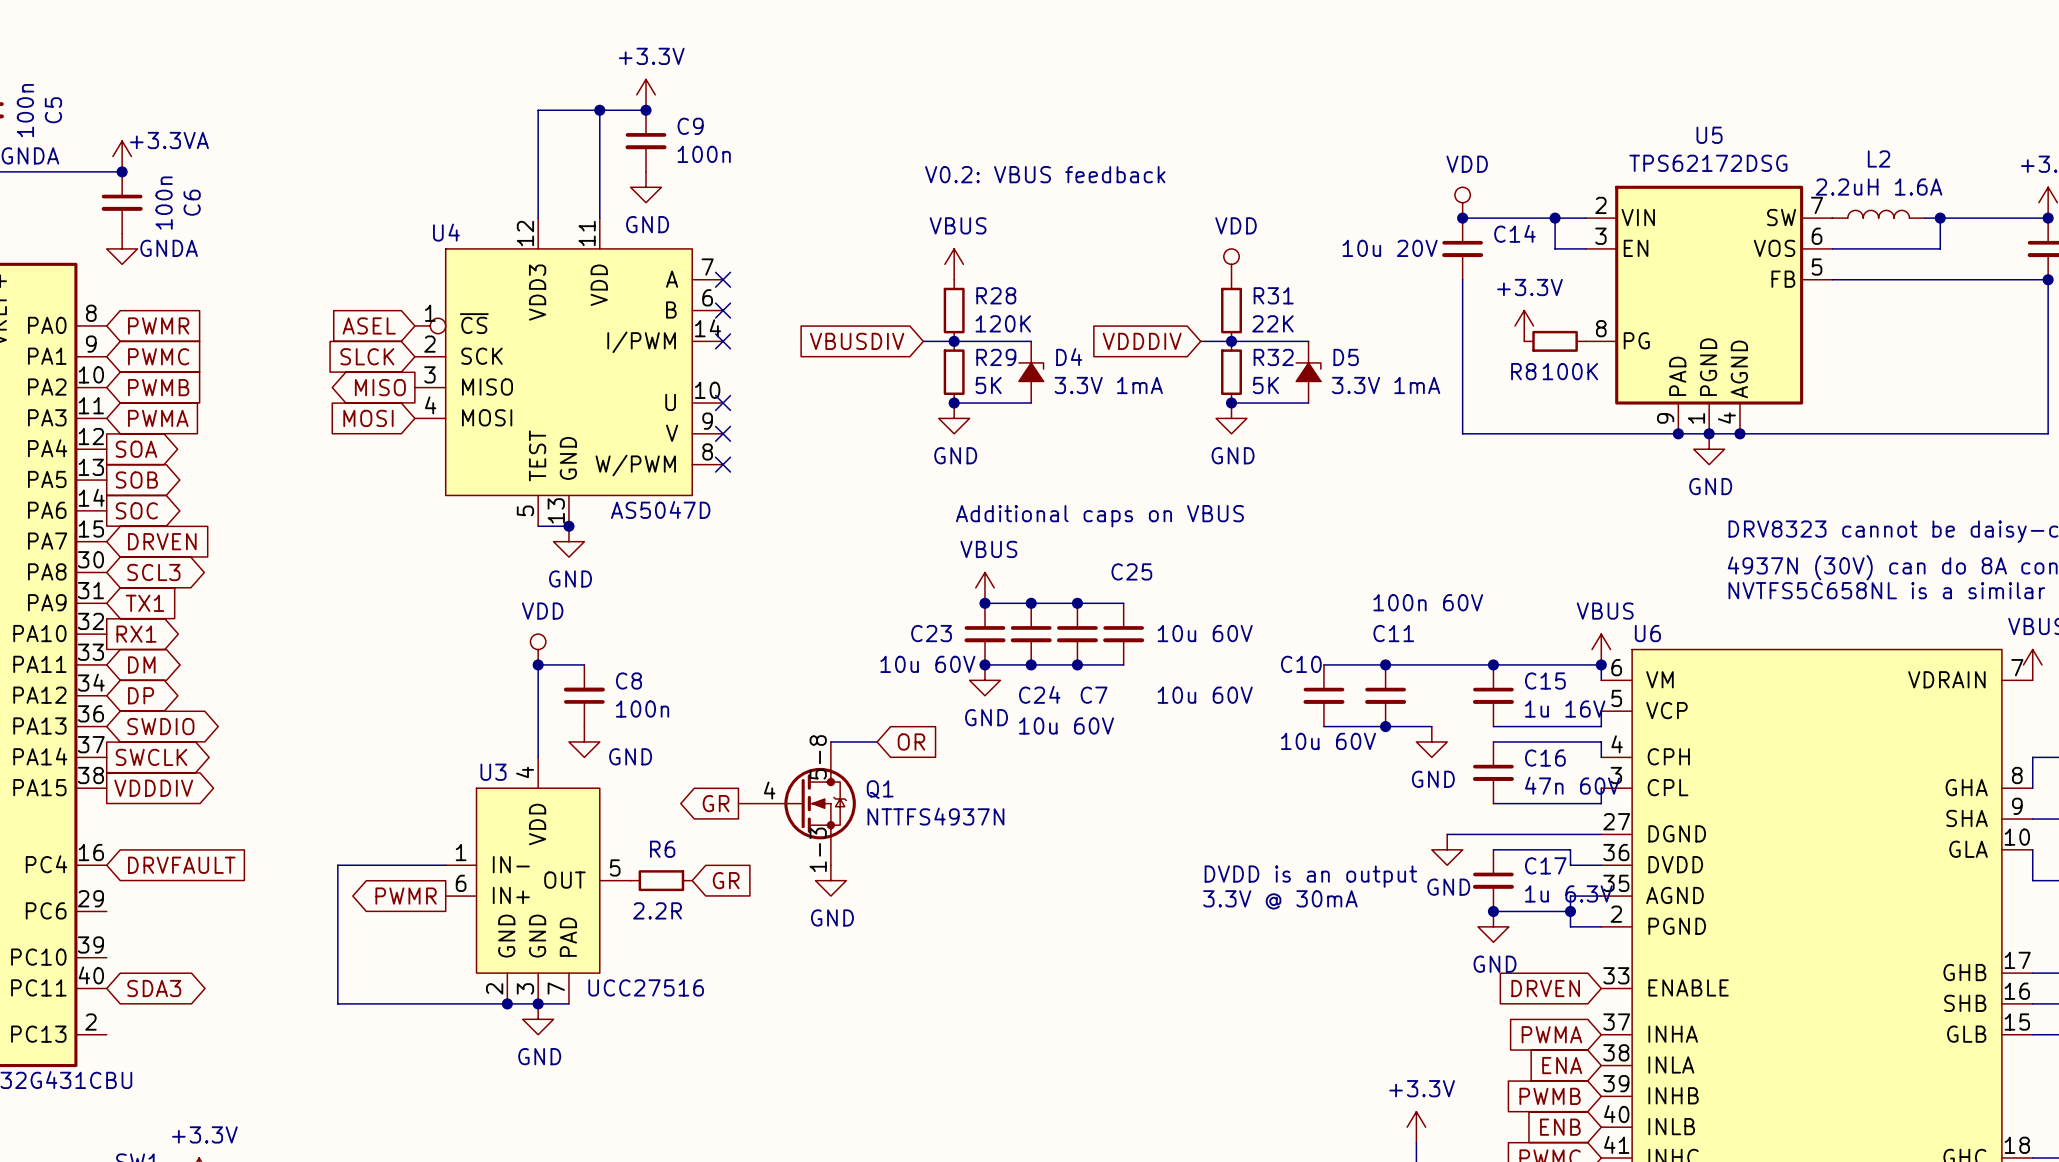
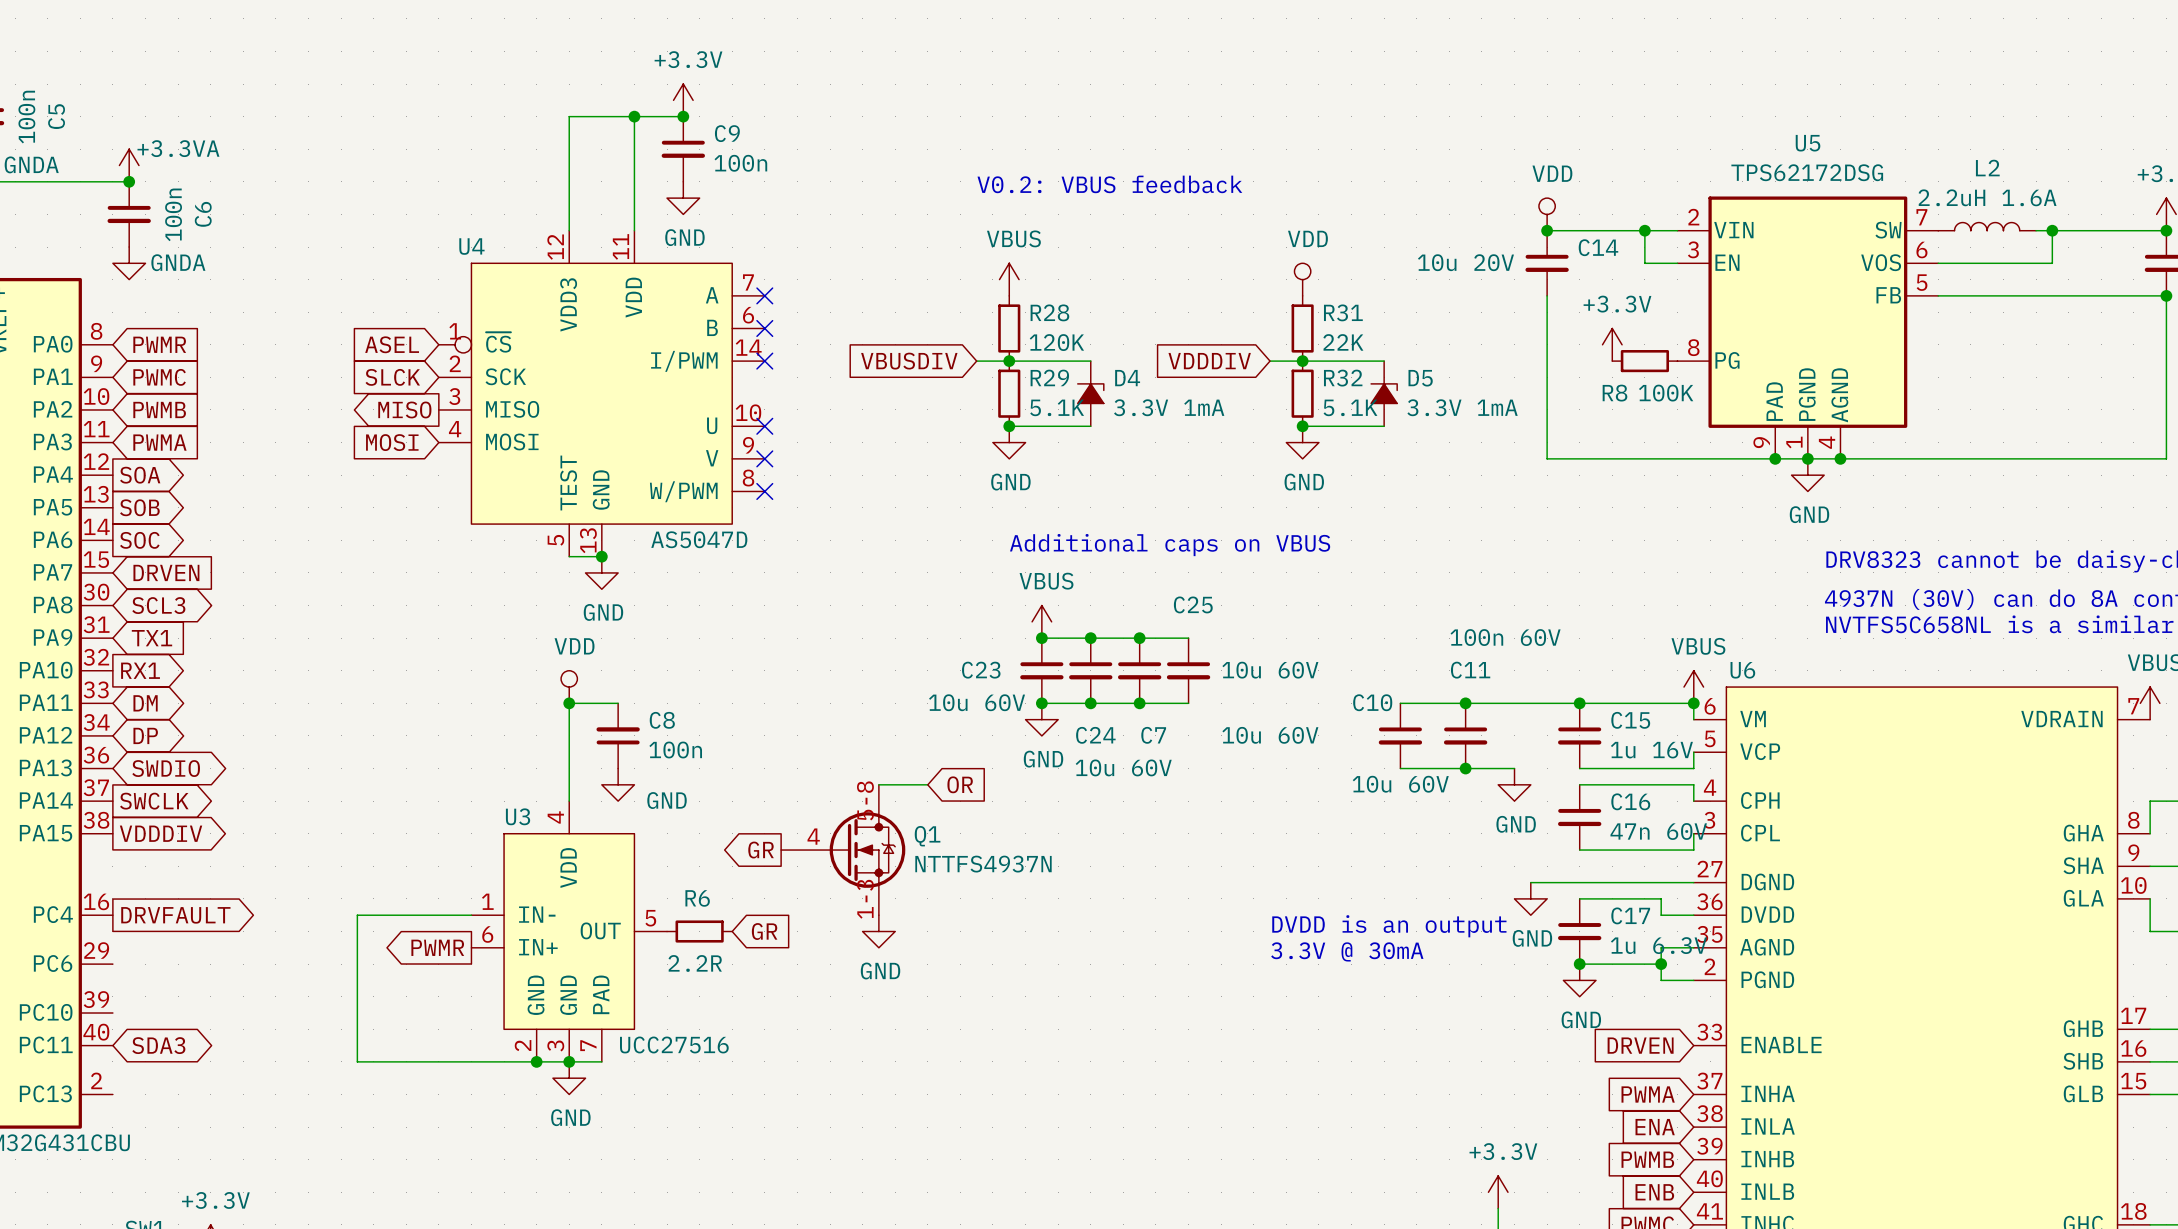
R29 value: 5K (988, 385) -> 5.1K (1057, 407)
R32 value: 5K (1265, 385) -> 5.1K (1350, 407)
global label shape: input (181, 865) -> output (175, 915)

